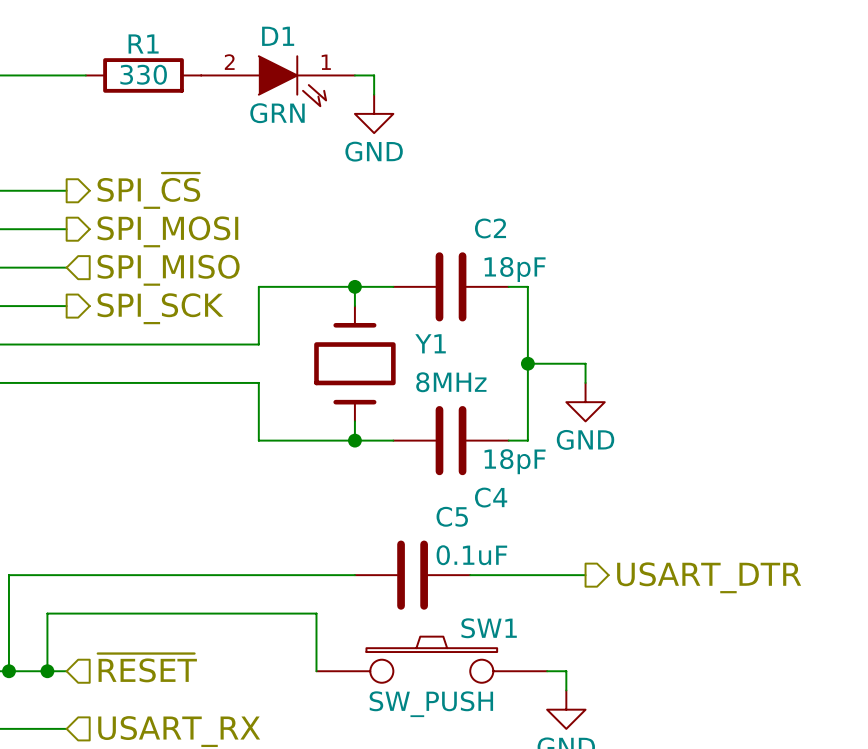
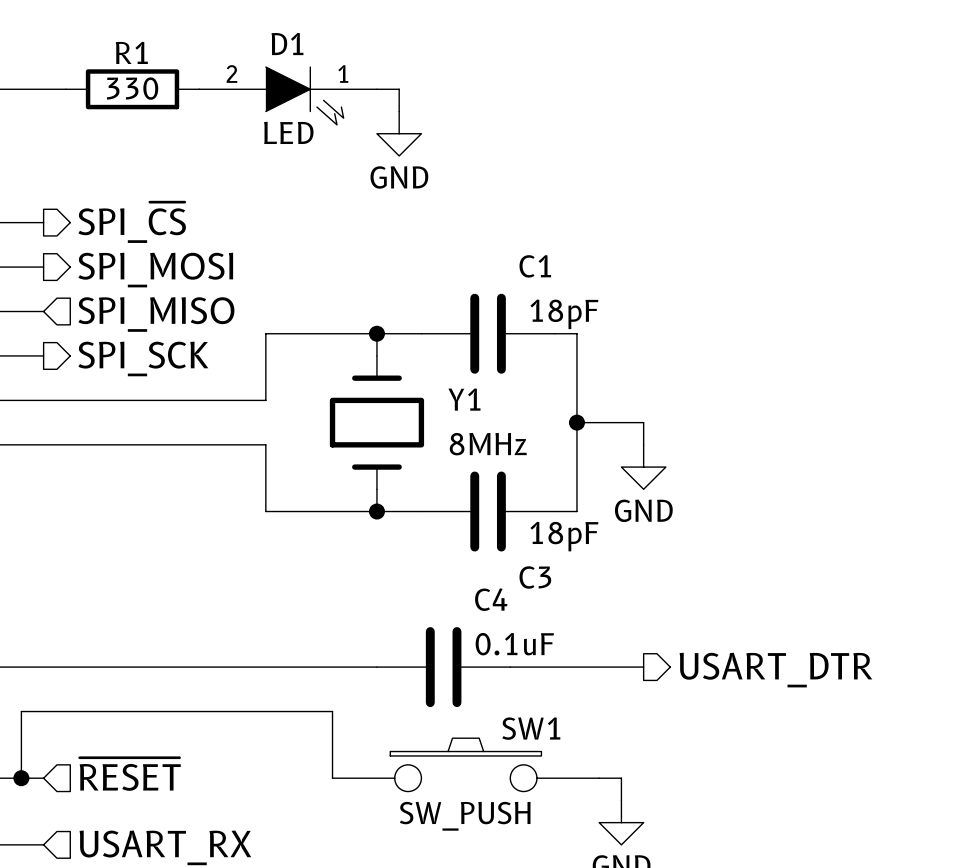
D1 value: GRN (277, 113) -> LED (288, 132)
C2 name: C2 (490, 228) -> C1 (535, 266)
C4 name: C4 (491, 497) -> C3 (535, 577)
C5 name: C5 (452, 516) -> C4 (491, 599)

